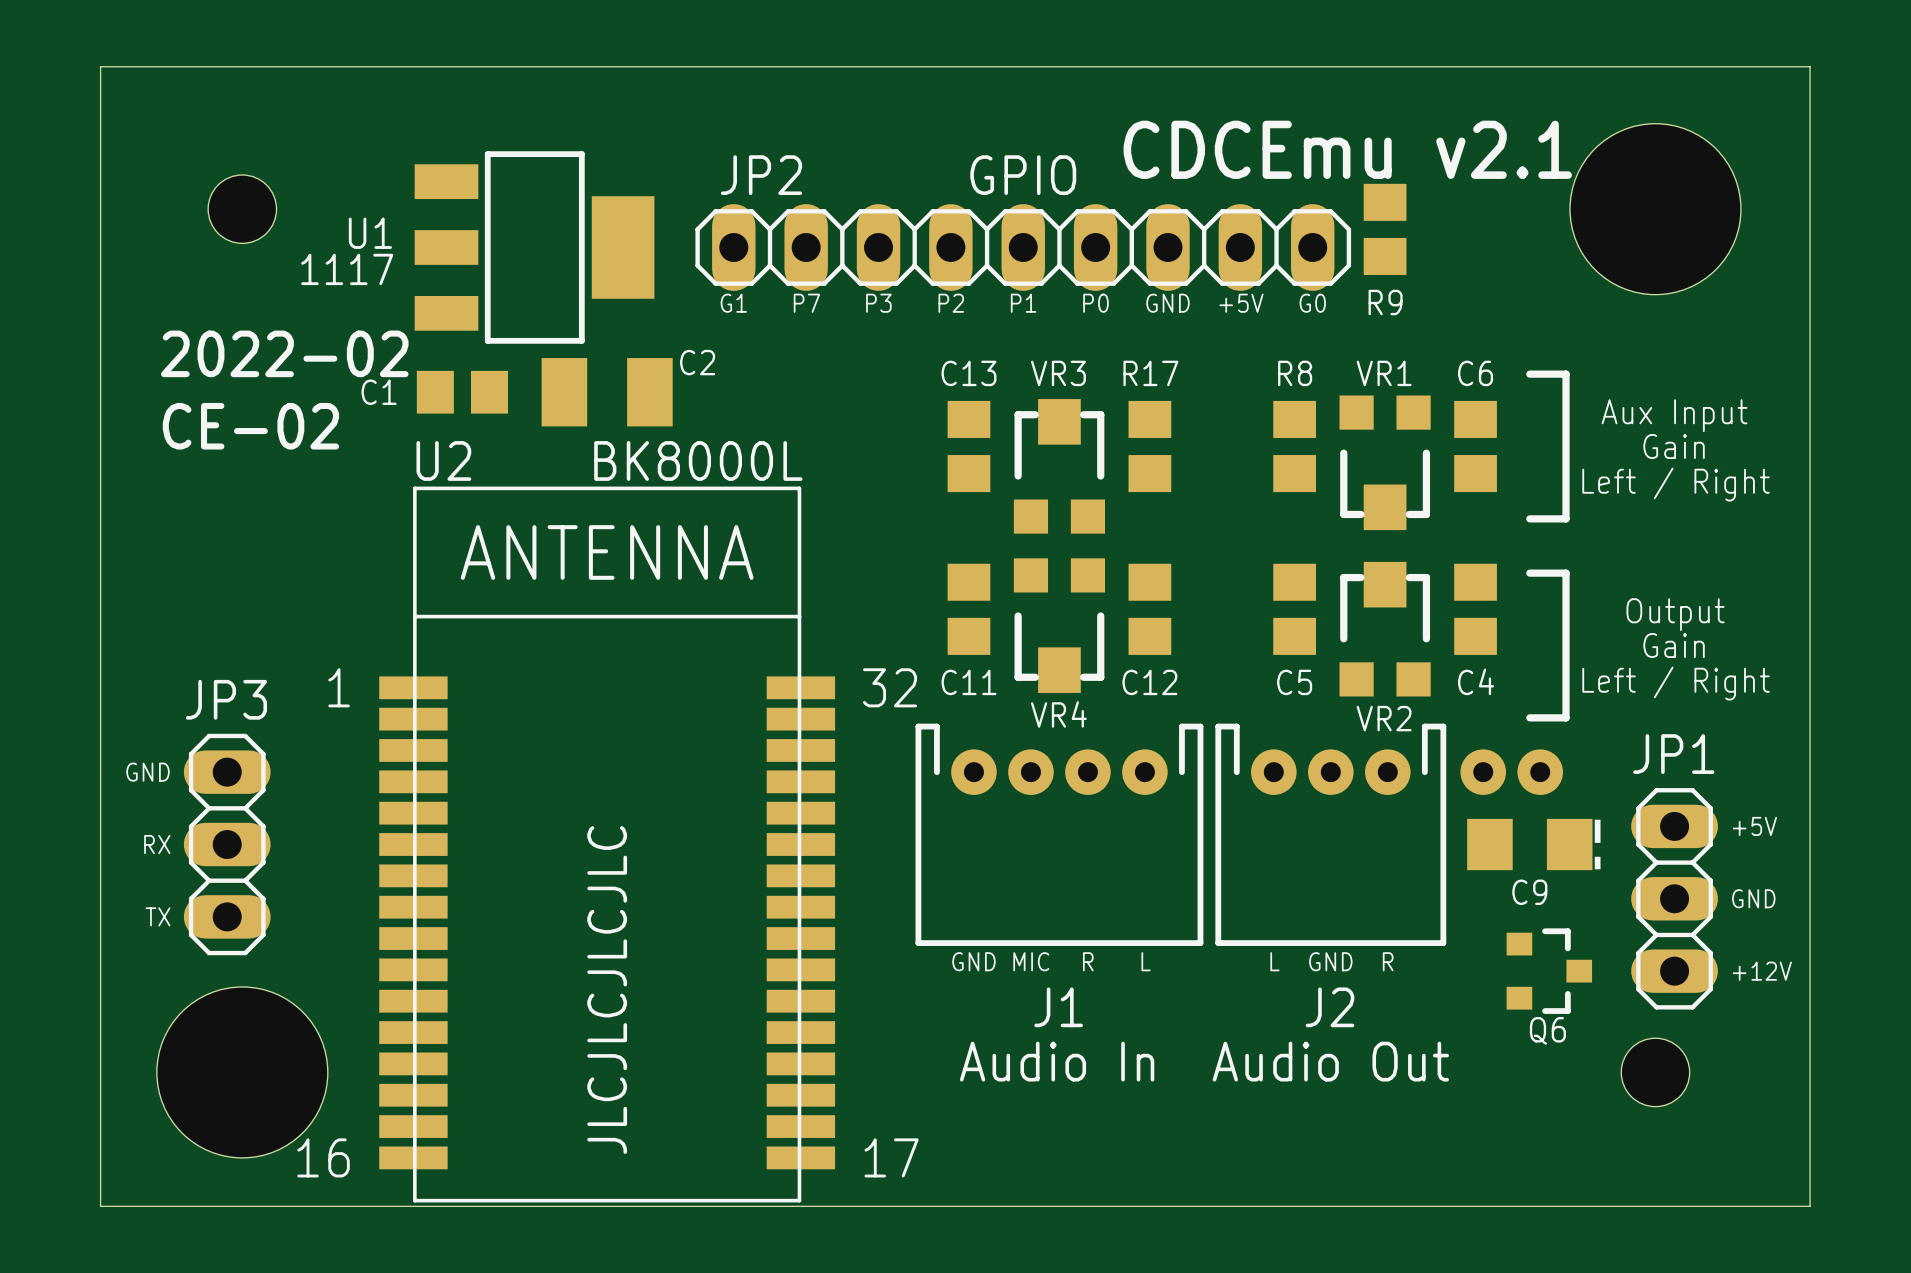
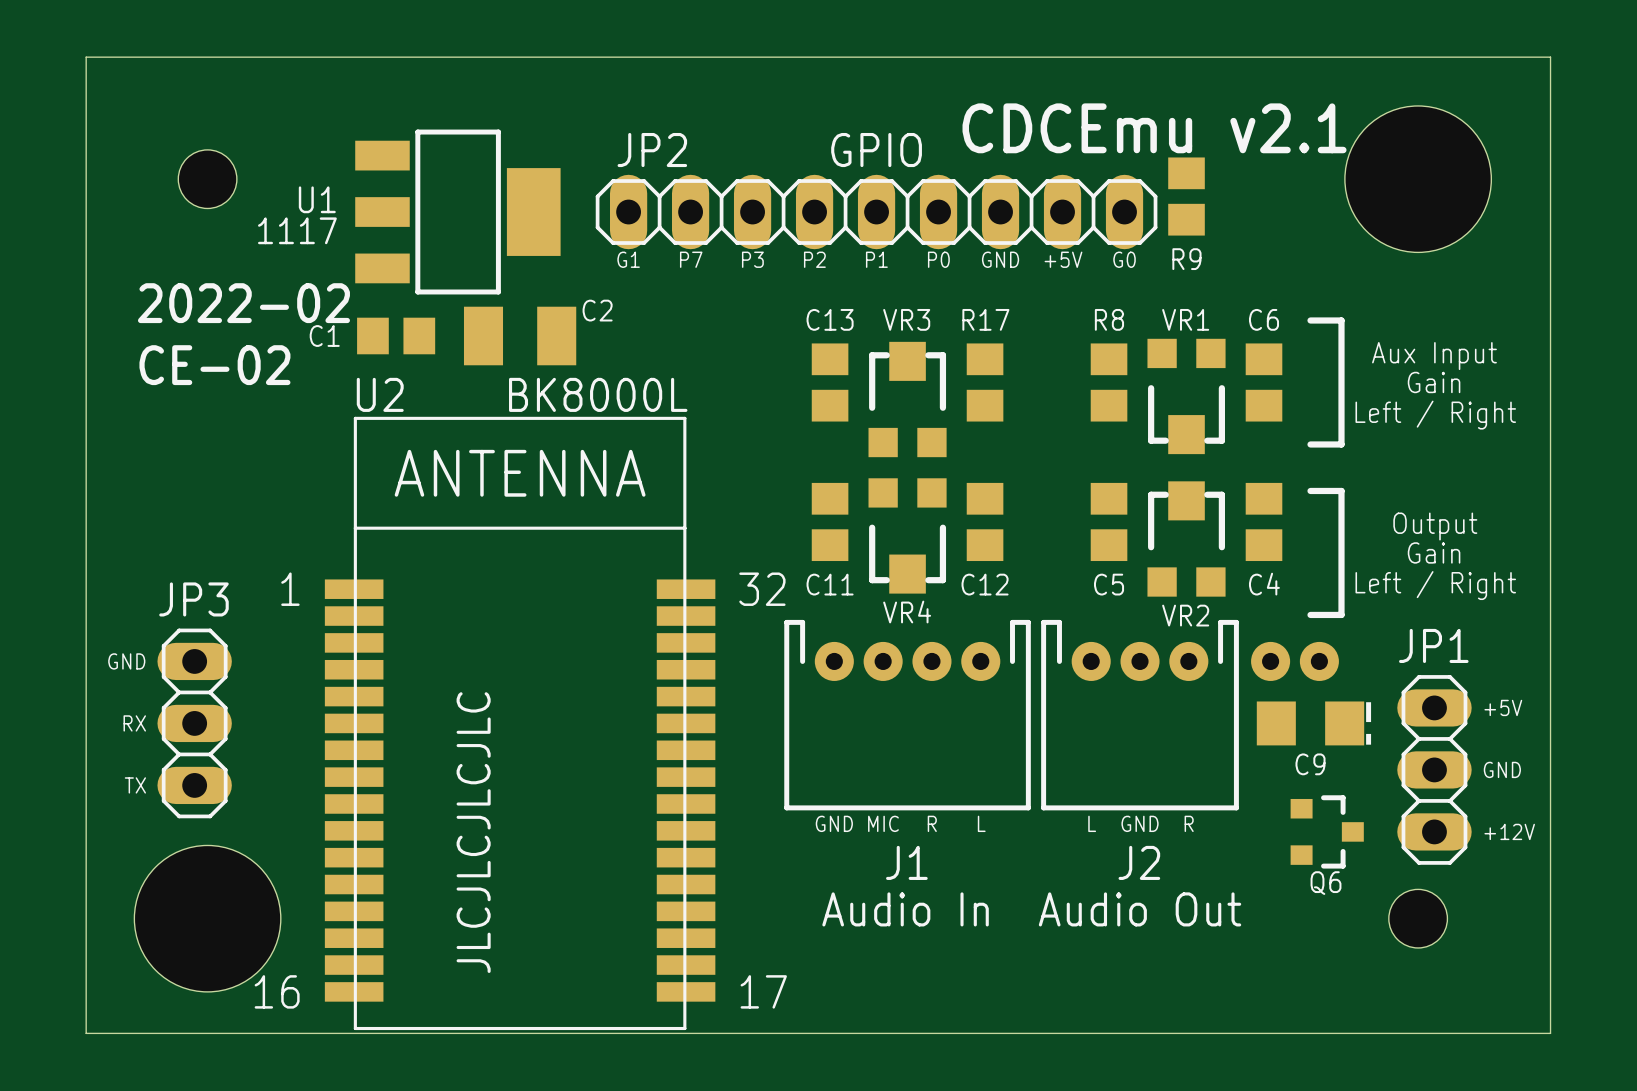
text position: JLCJLCJLCJLC (607, 990) -> JLCJLCJLCJLC (473, 832)

